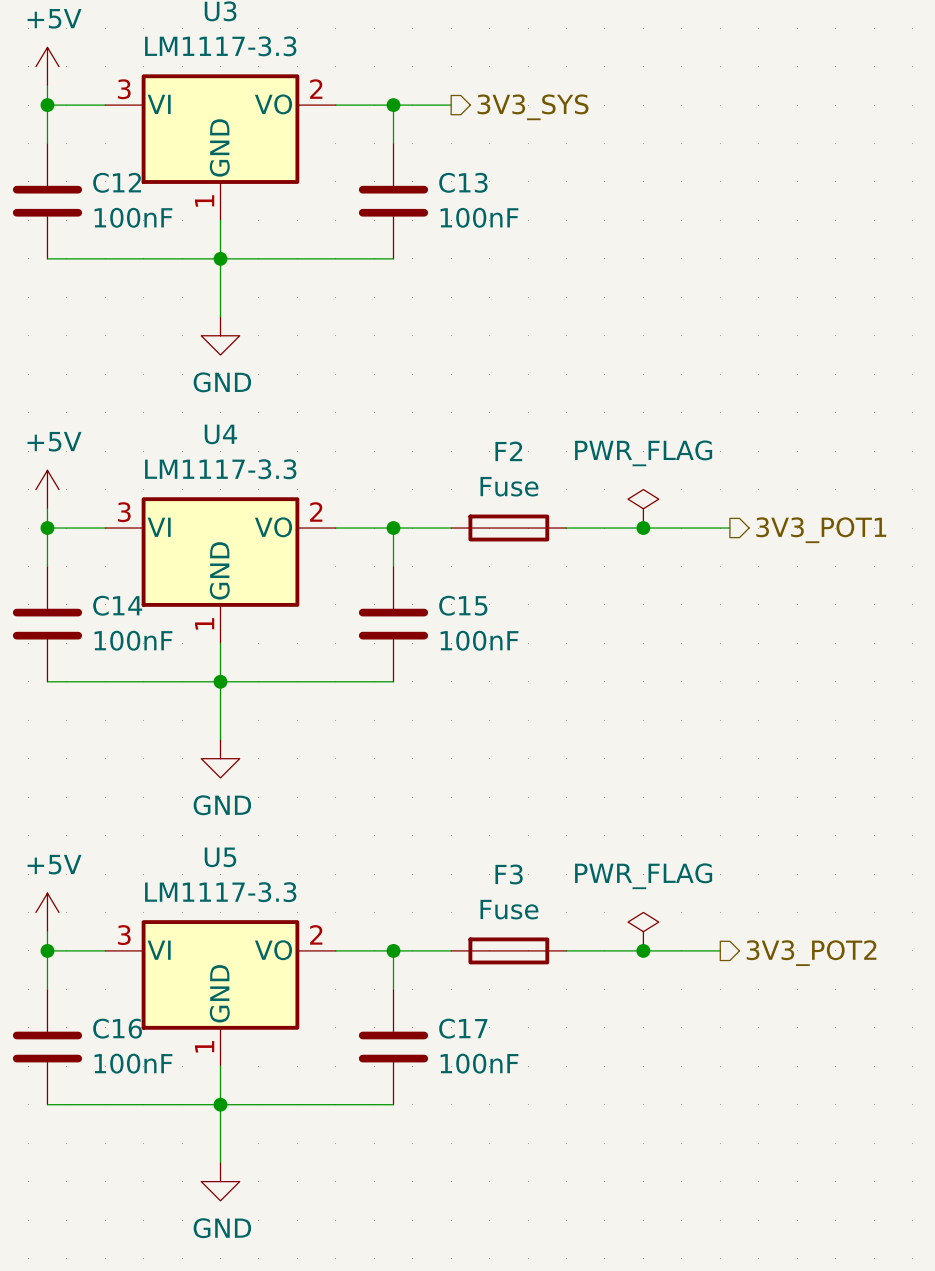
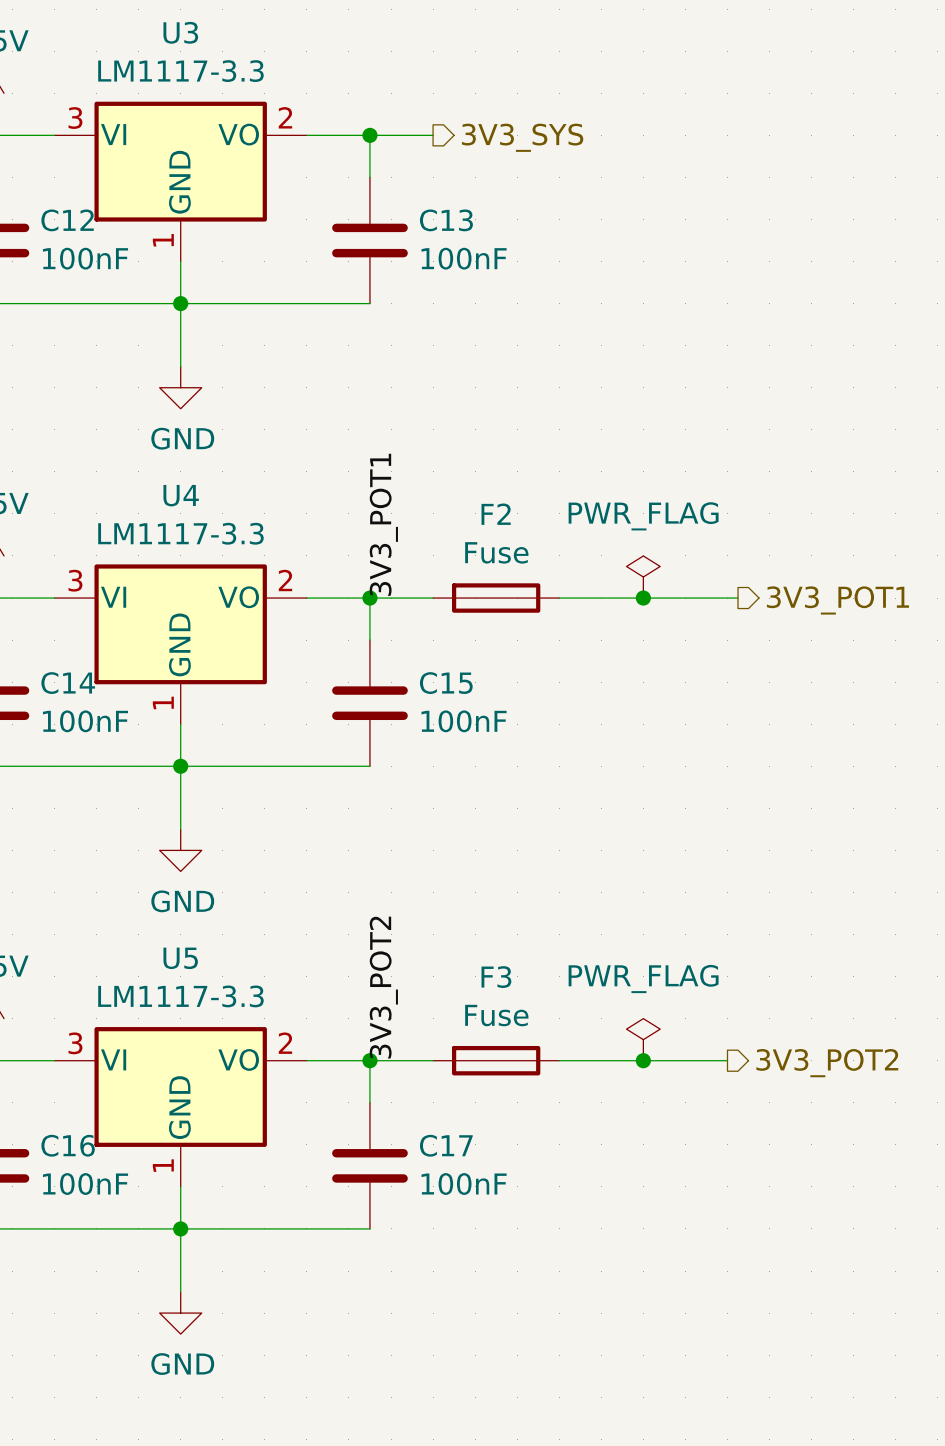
label: none -> 3V3_POT1 (383, 524)
label: none -> 3V3_POT2 (383, 987)

